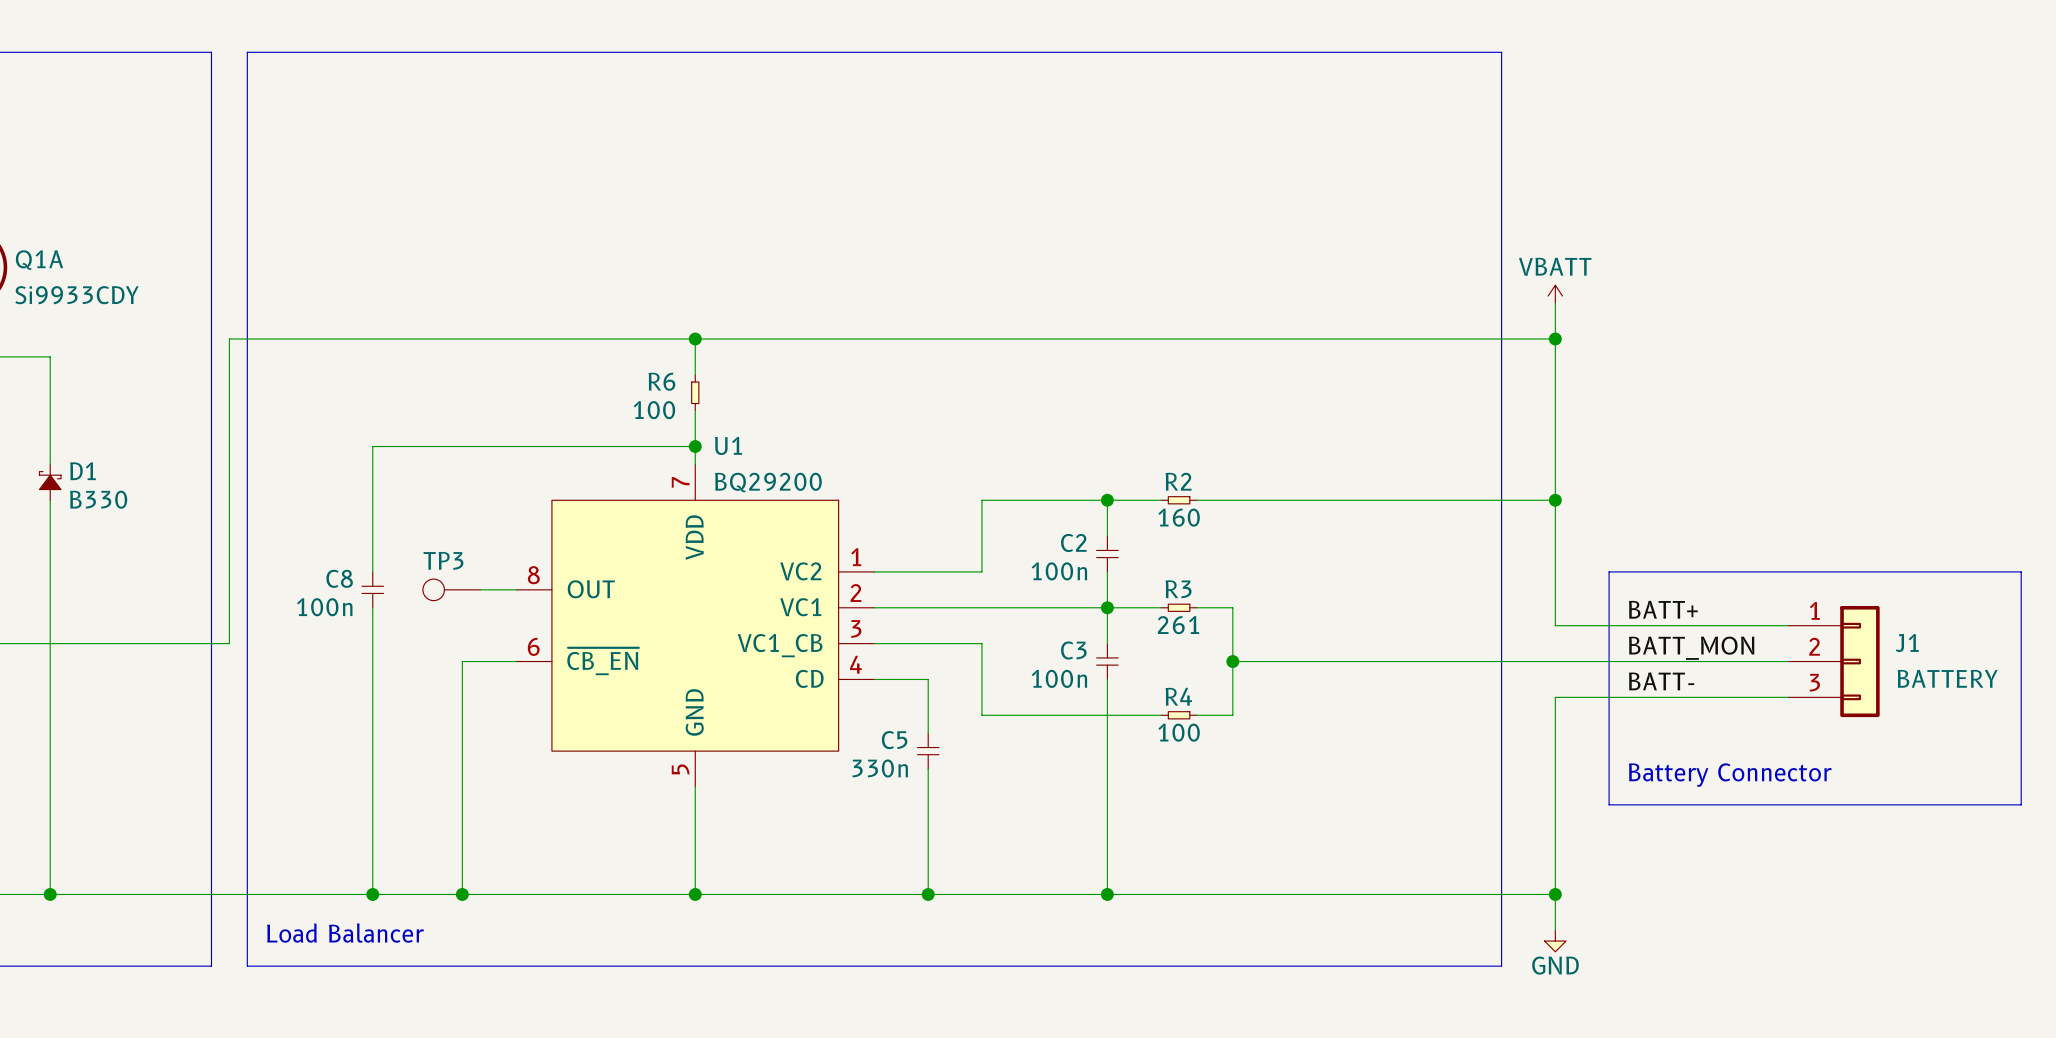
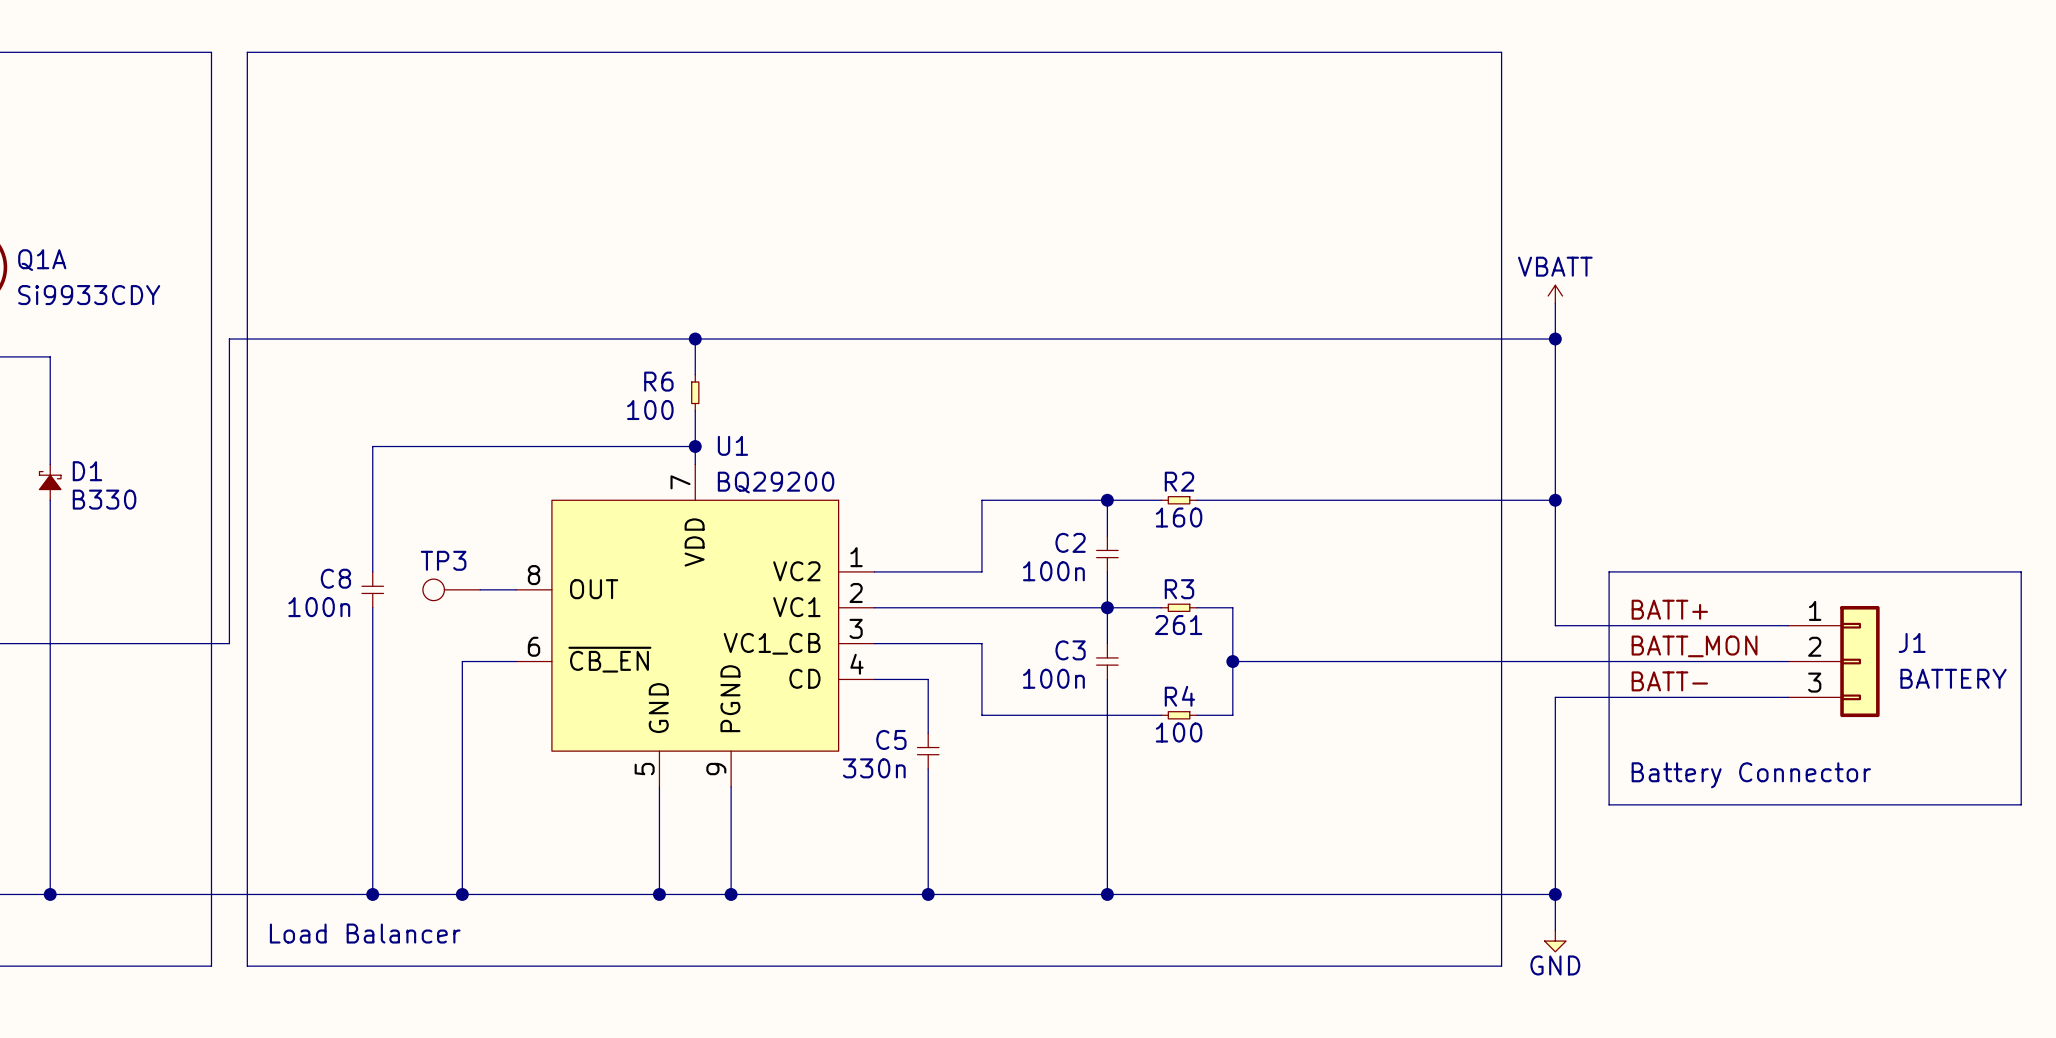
U1 symbol: [516, 464, 875, 787] -> [516, 464, 875, 787]
wire: (695, 786) (695, 894) -> (659, 786) (659, 894)
wire: none -> (731, 786) (731, 894)
junction: none -> (659, 894)
junction: (695, 894) -> none
junction: none -> (731, 894)

